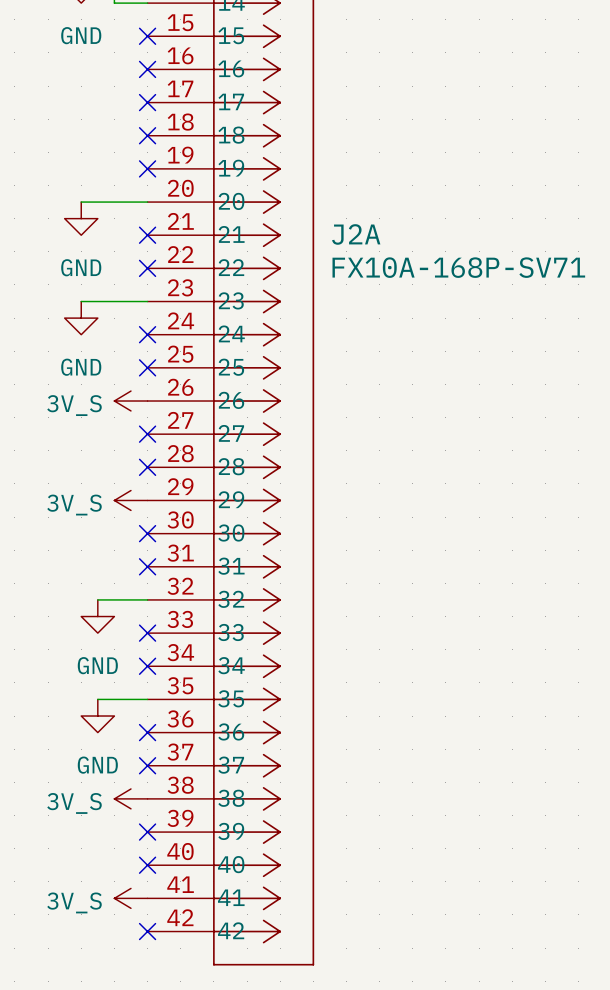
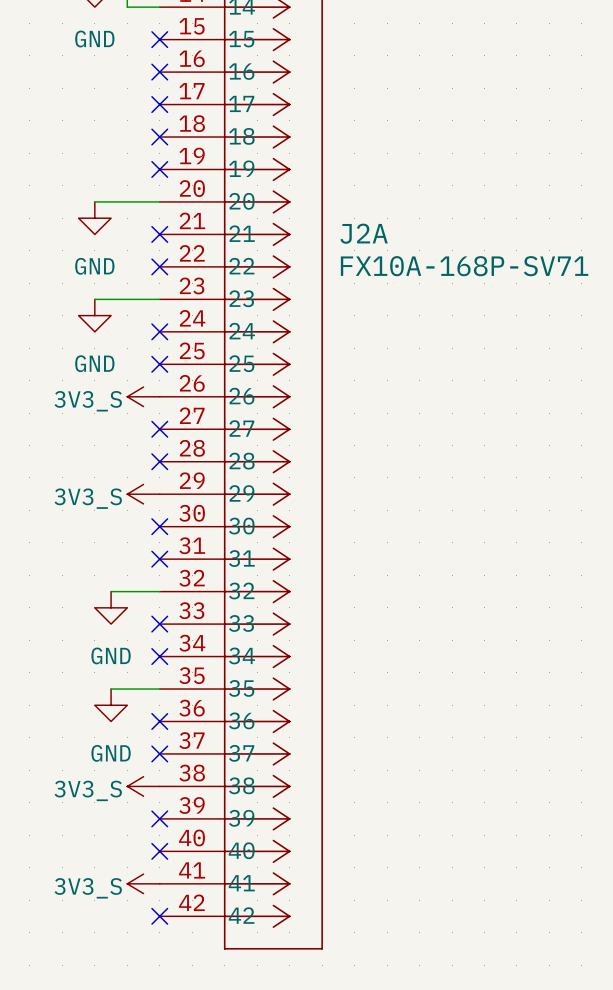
power symbol: 3V_S (130, 401) -> 3V3_S (143, 396)
power symbol: 3V_S (130, 500) -> 3V3_S (143, 494)
power symbol: 3V_S (130, 798) -> 3V3_S (143, 786)
power symbol: 3V_S (130, 898) -> 3V3_S (143, 883)

